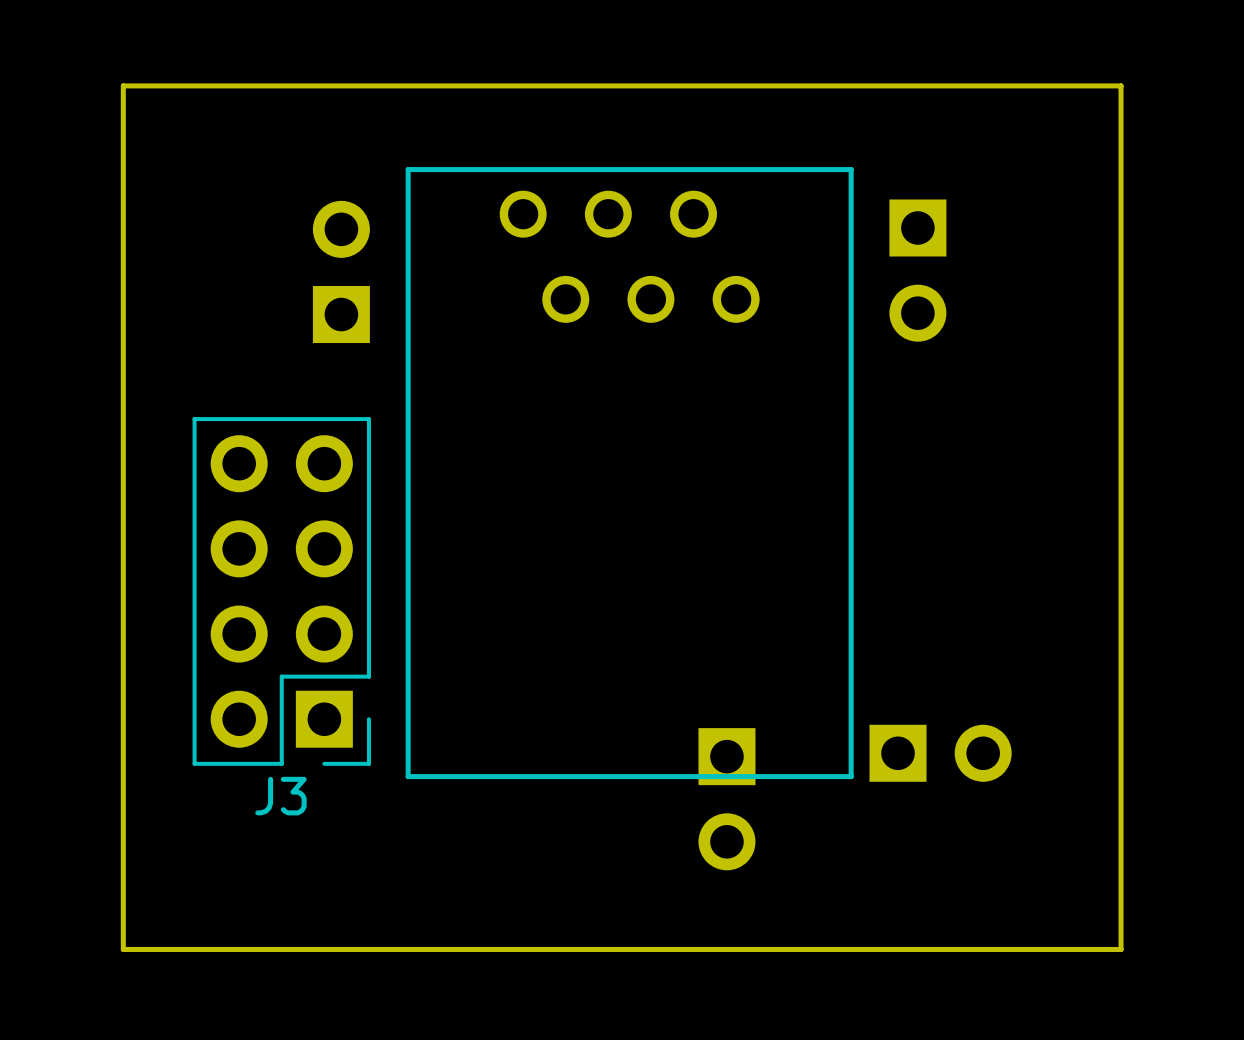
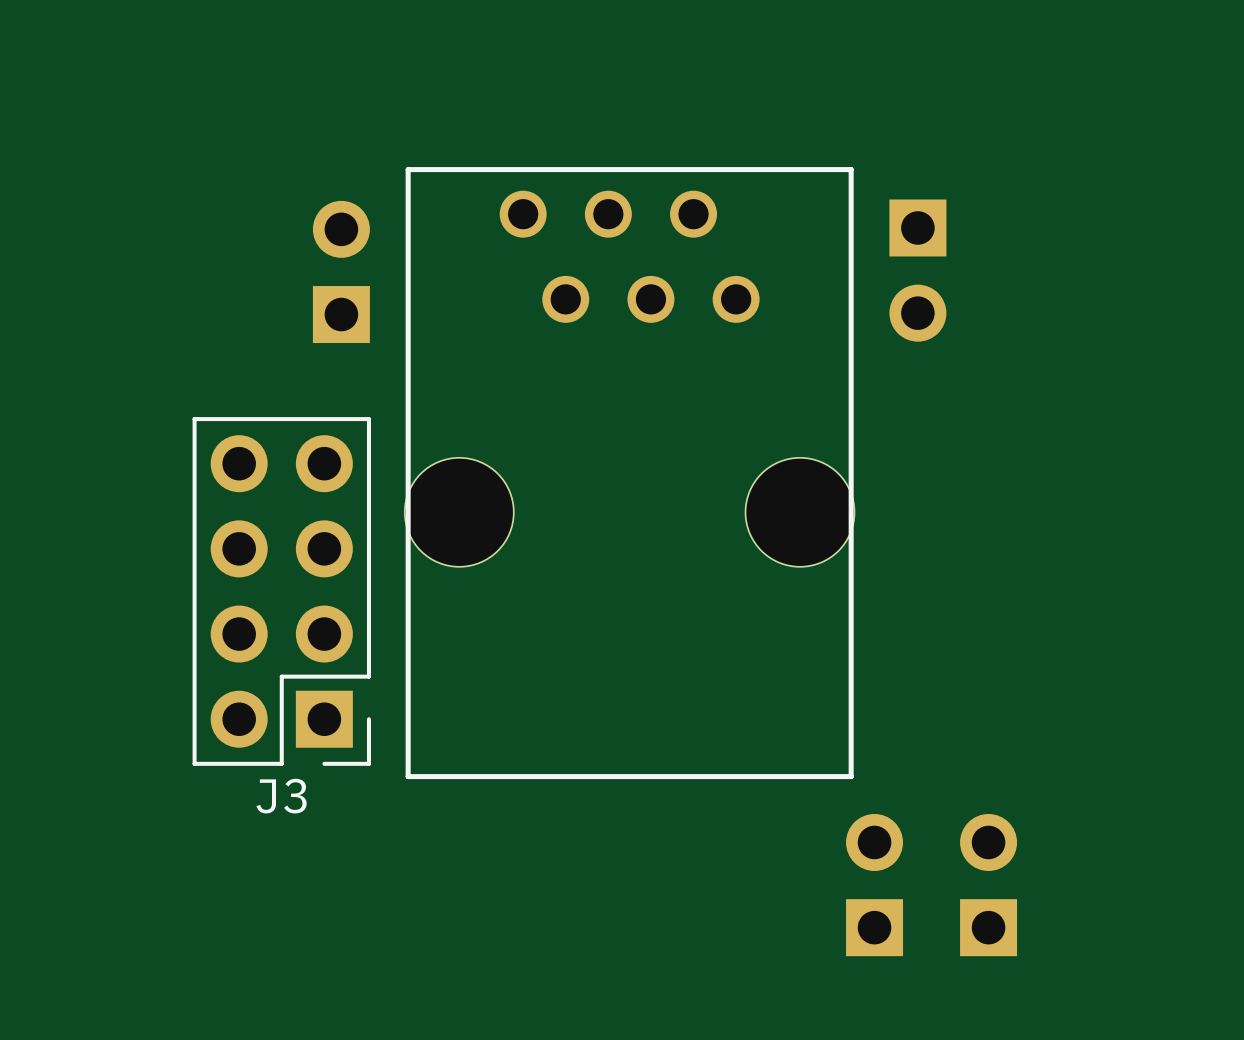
board edge: (1121, 85) (123, 85) (123, 949) (1121, 949) (1121, 85) -> none
part footprint: [405, 167, 854, 780] -> [404, 167, 855, 780]
part: (940, 753) -> none
part: (726, 799) -> none
part: none -> (874, 885)
part: none -> (988, 885)

